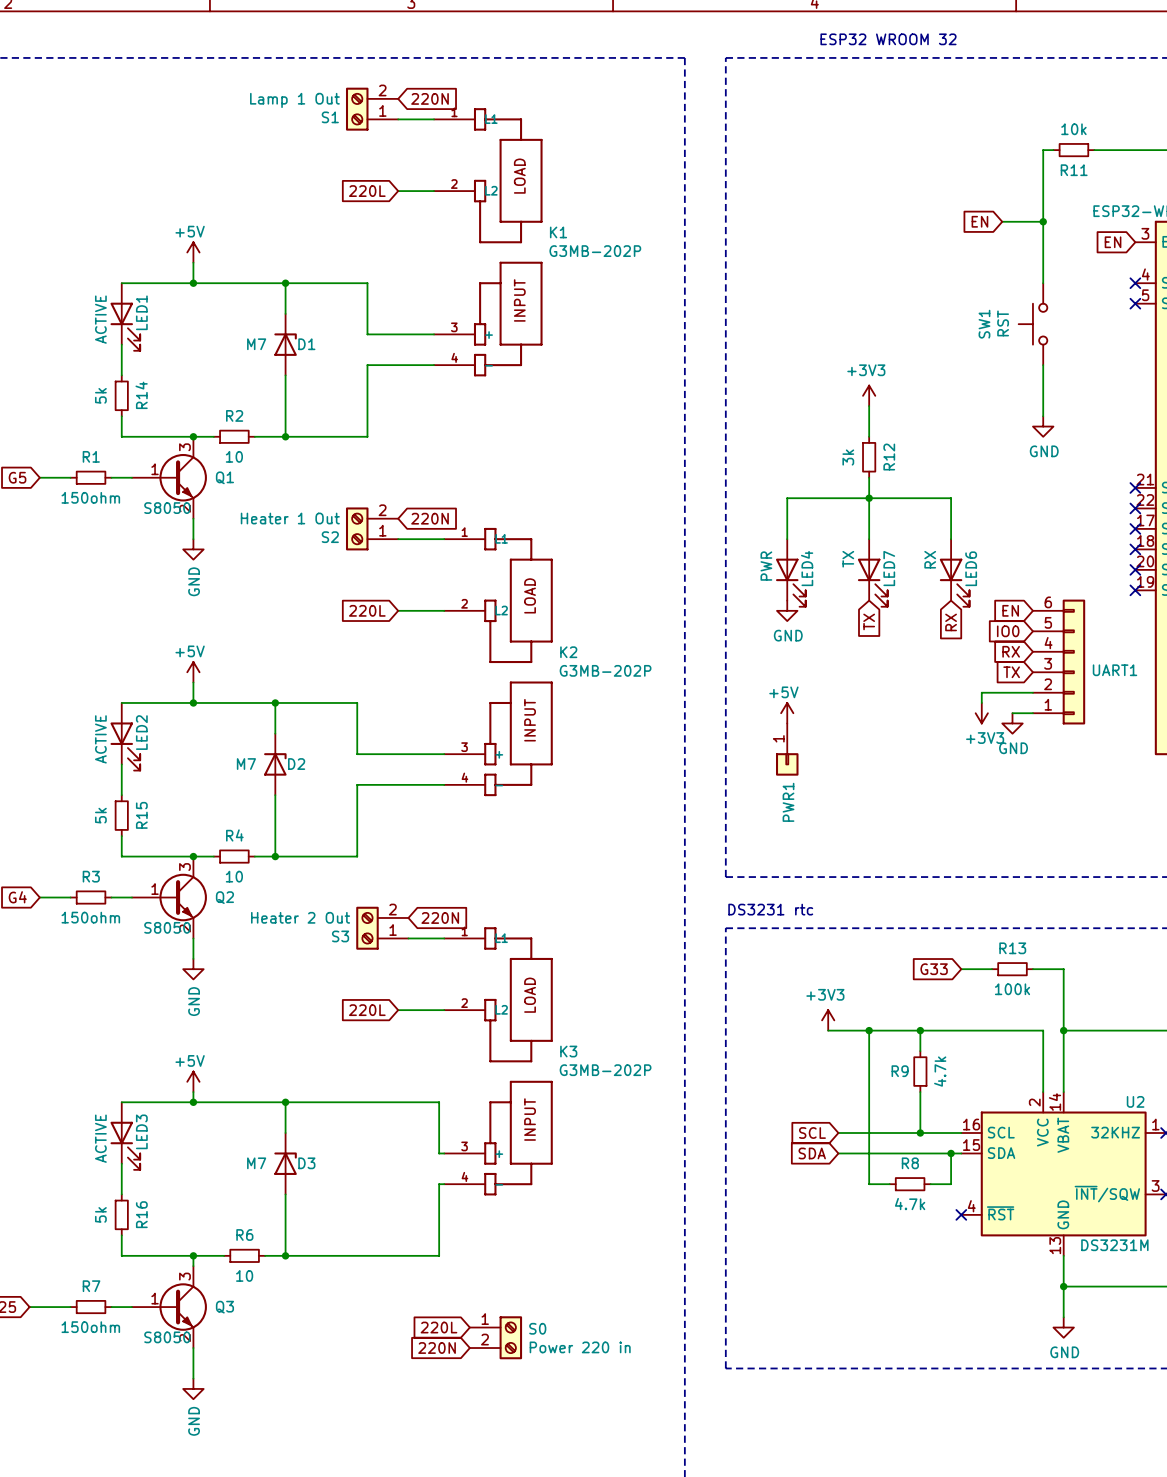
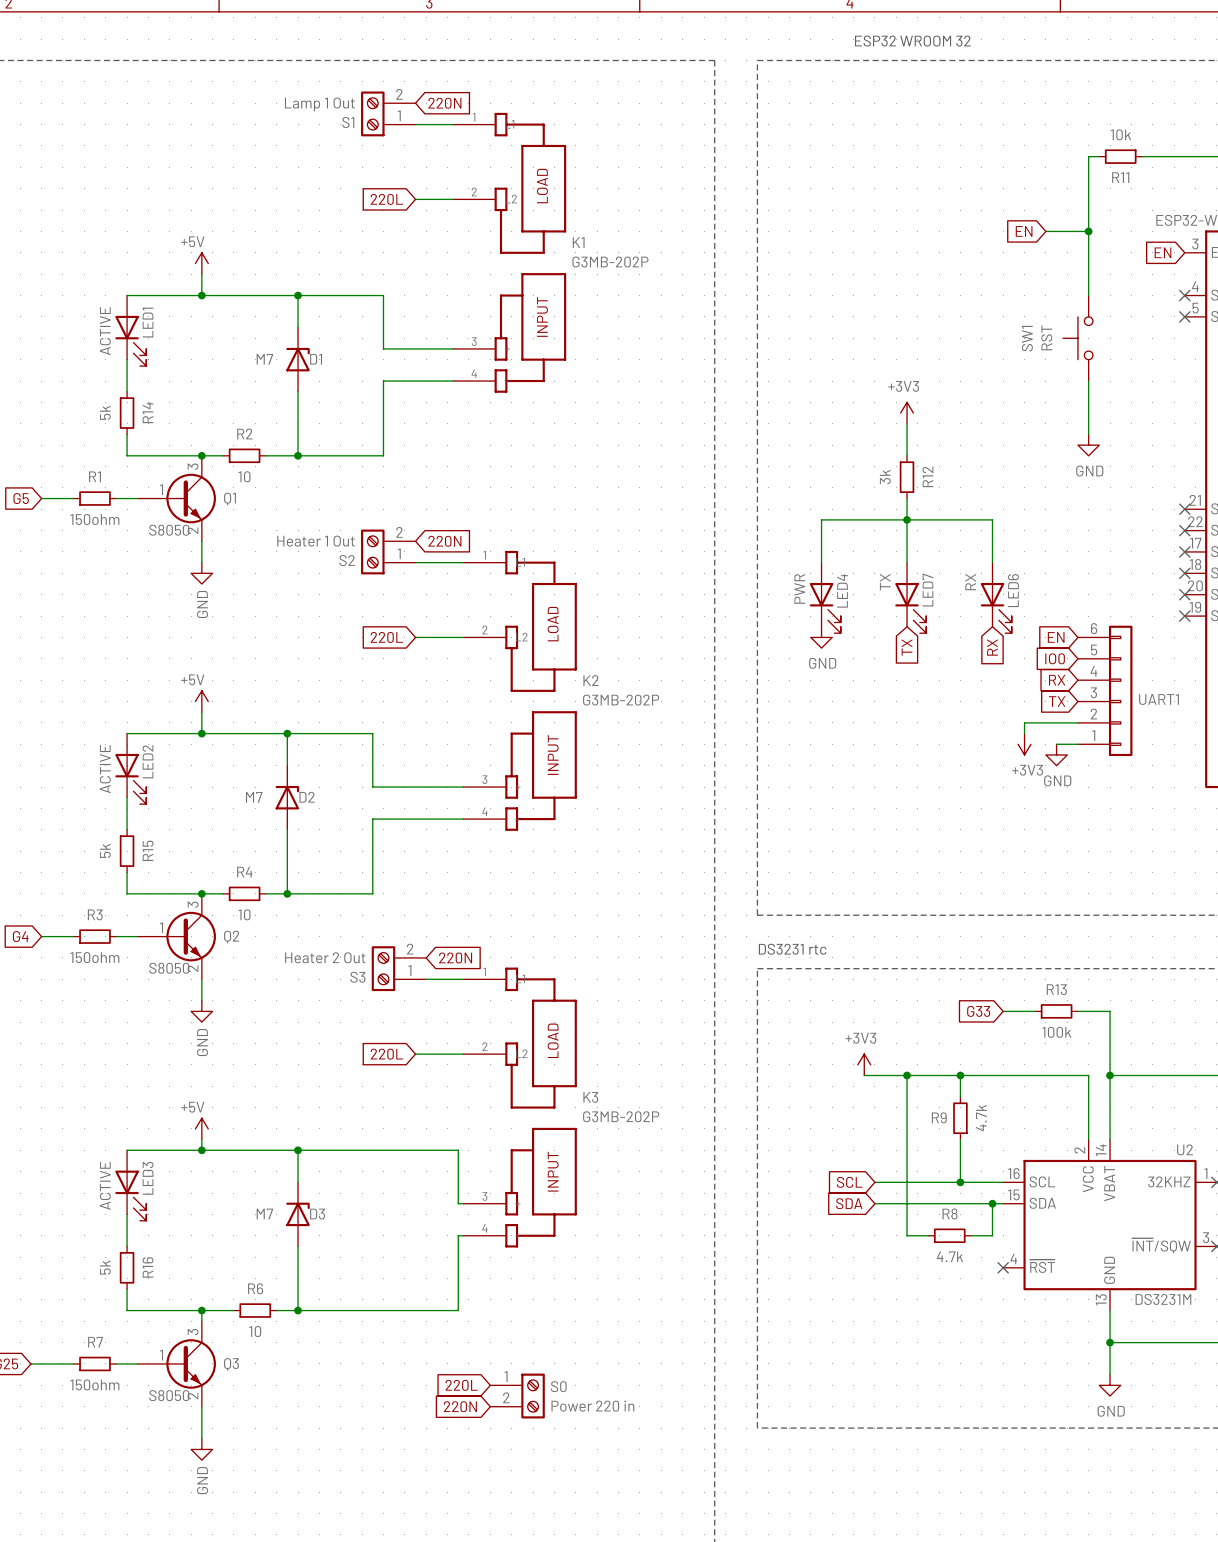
power symbol: +5V (787, 713) -> none
PWR1: (787, 749) -> none

